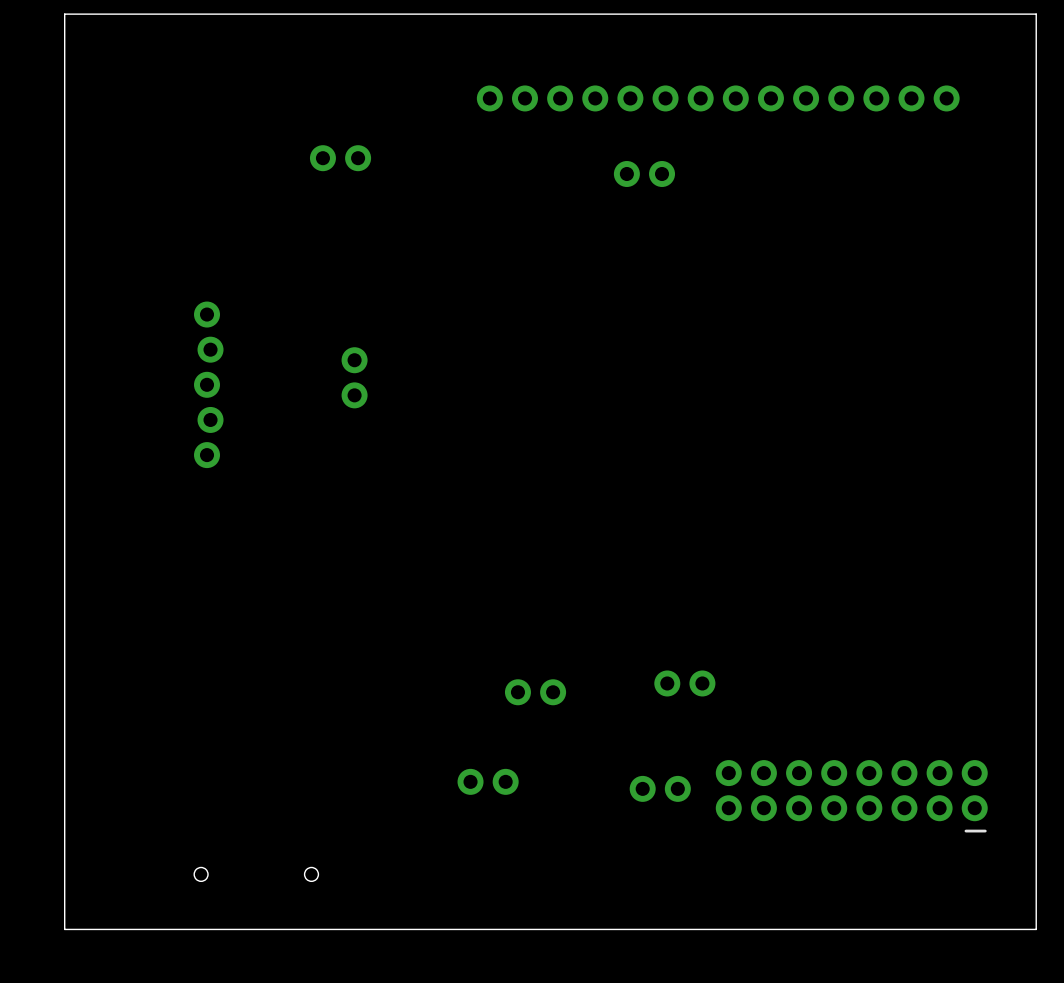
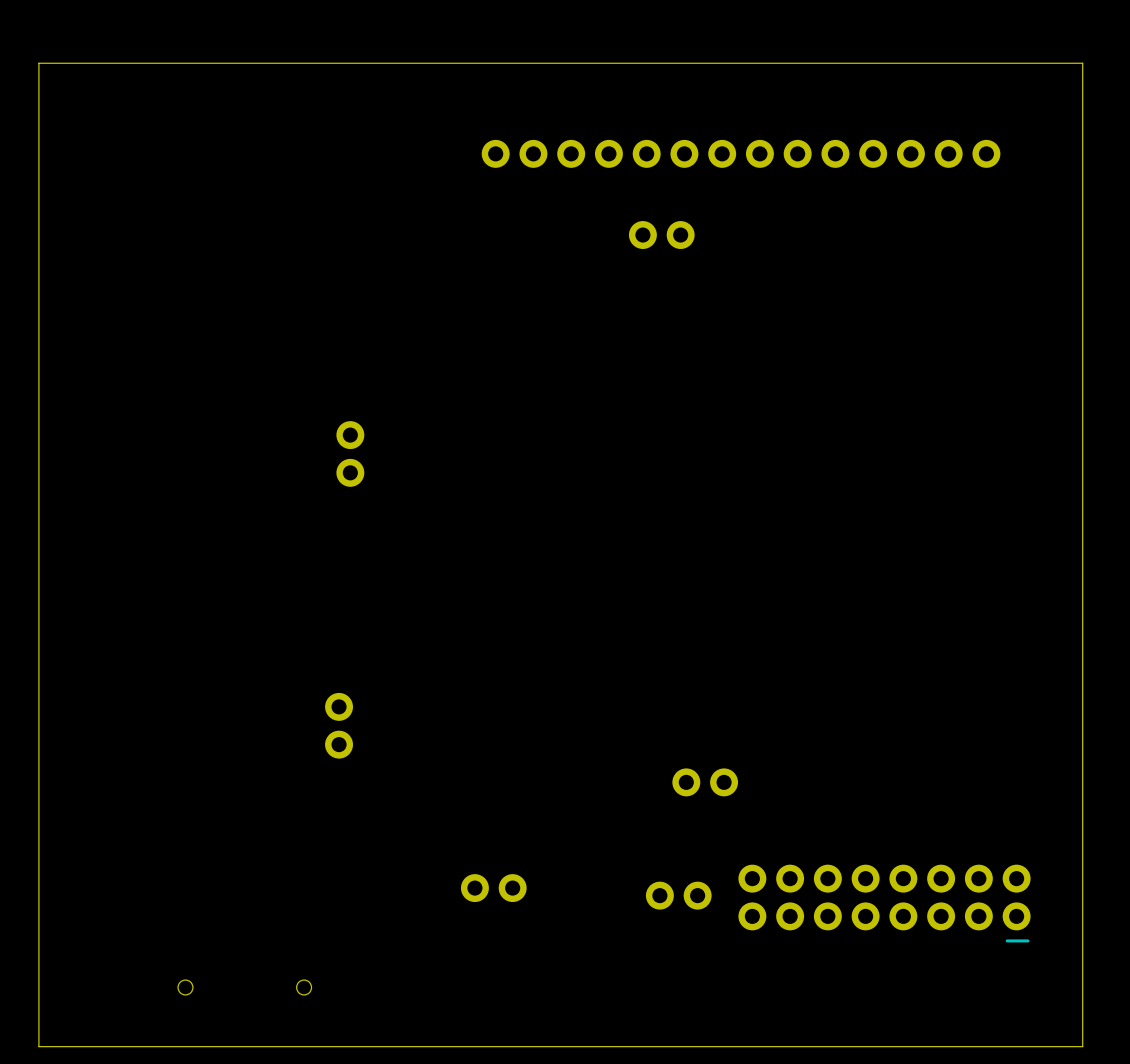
part: (340, 158) -> none
part: (208, 384) -> none
part rotation: 0° (535, 692) -> 90° clockwise (339, 725)
part position: (535, 692) -> (339, 725)

